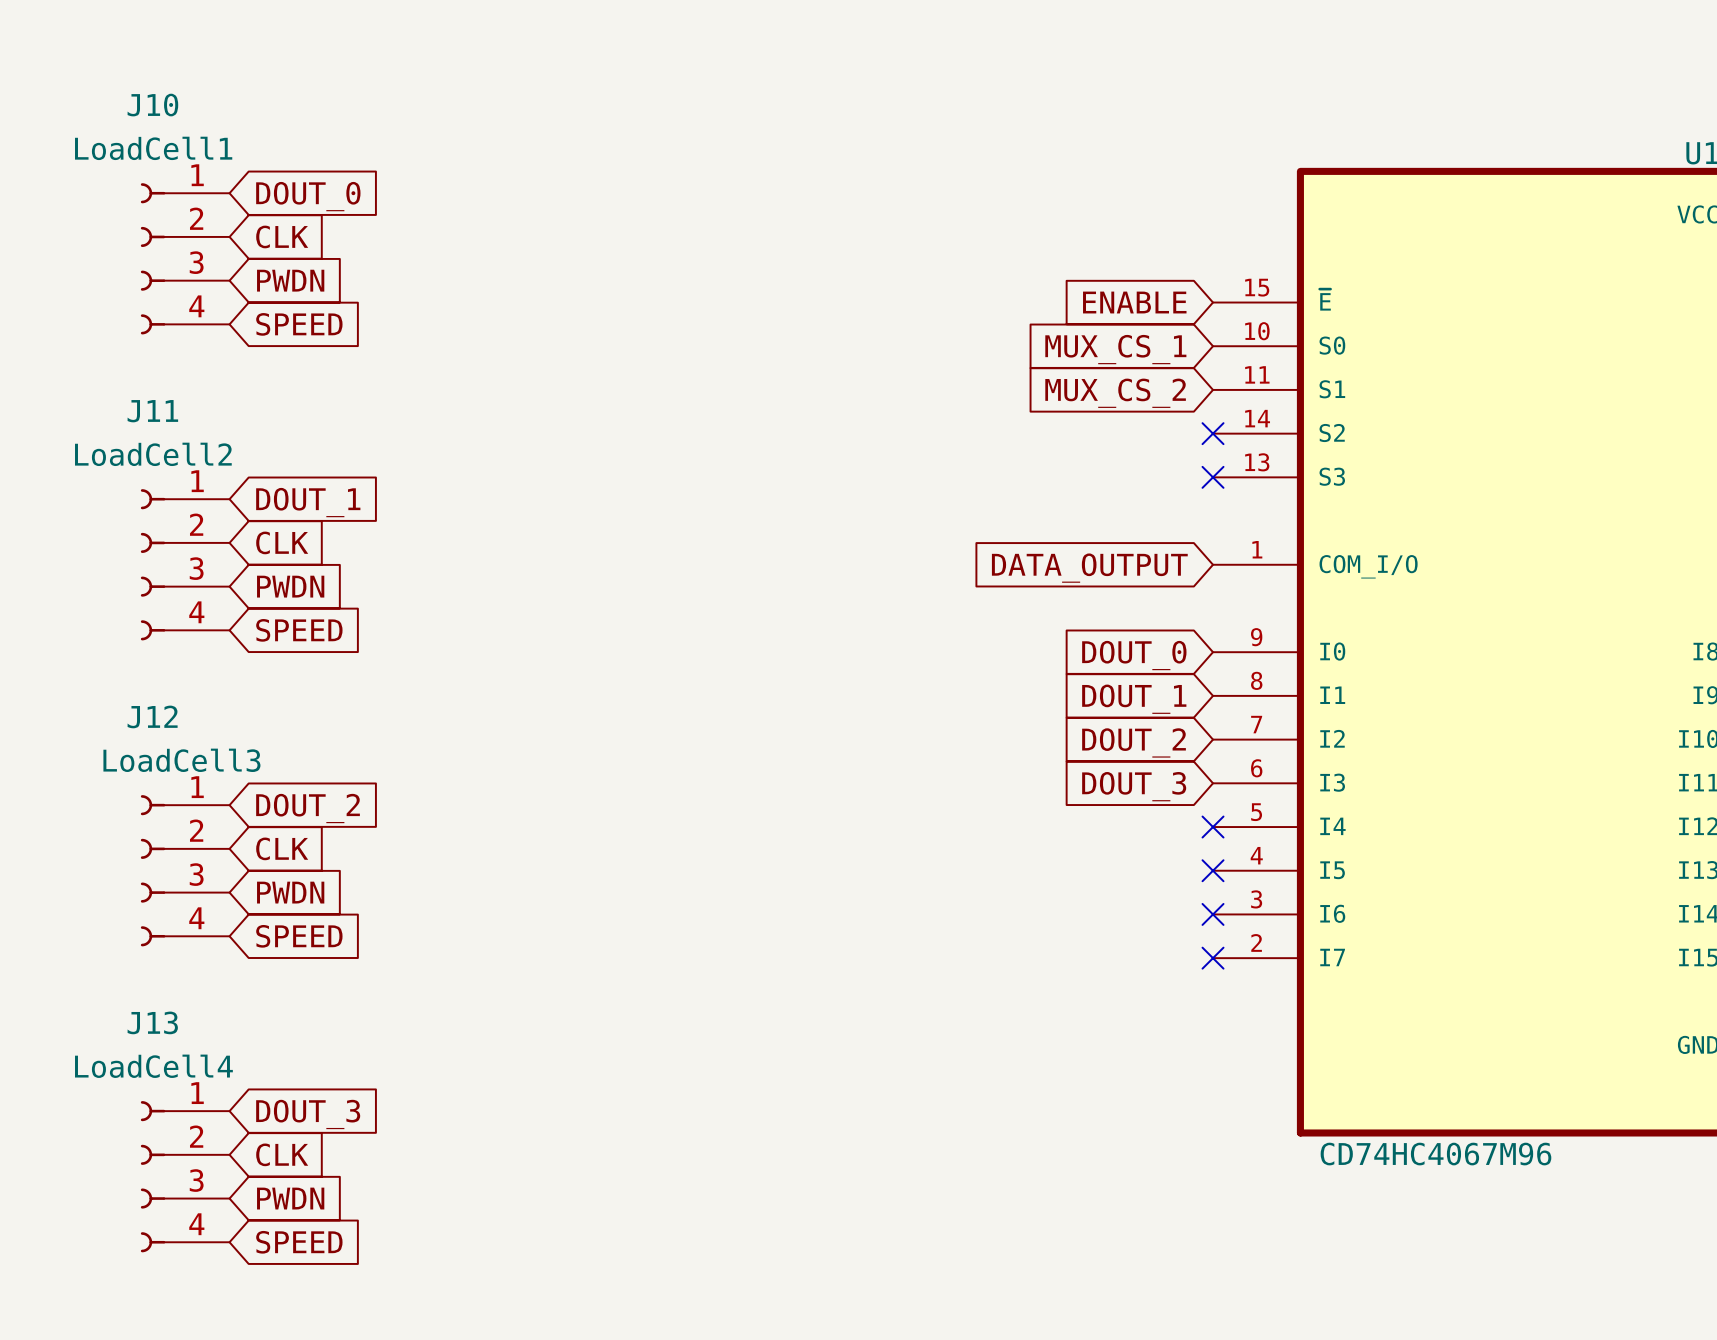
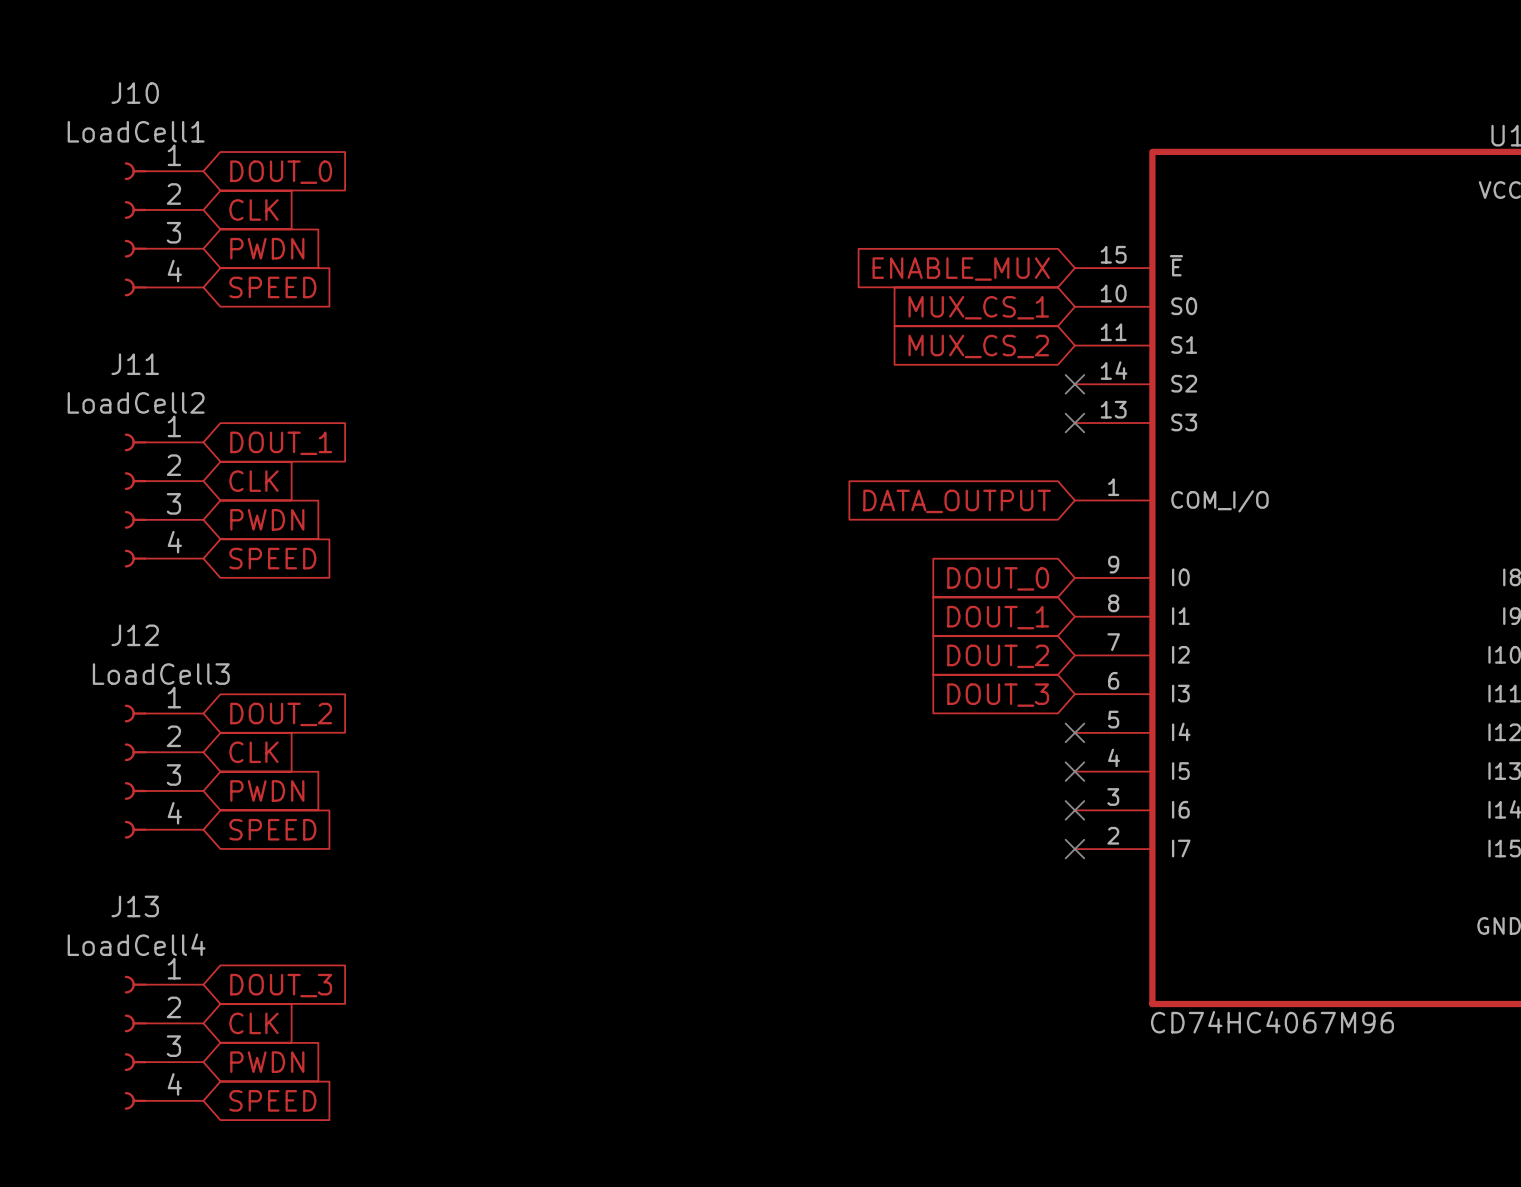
global label: ENABLE (1134, 302) -> ENABLE_MUX (961, 269)

